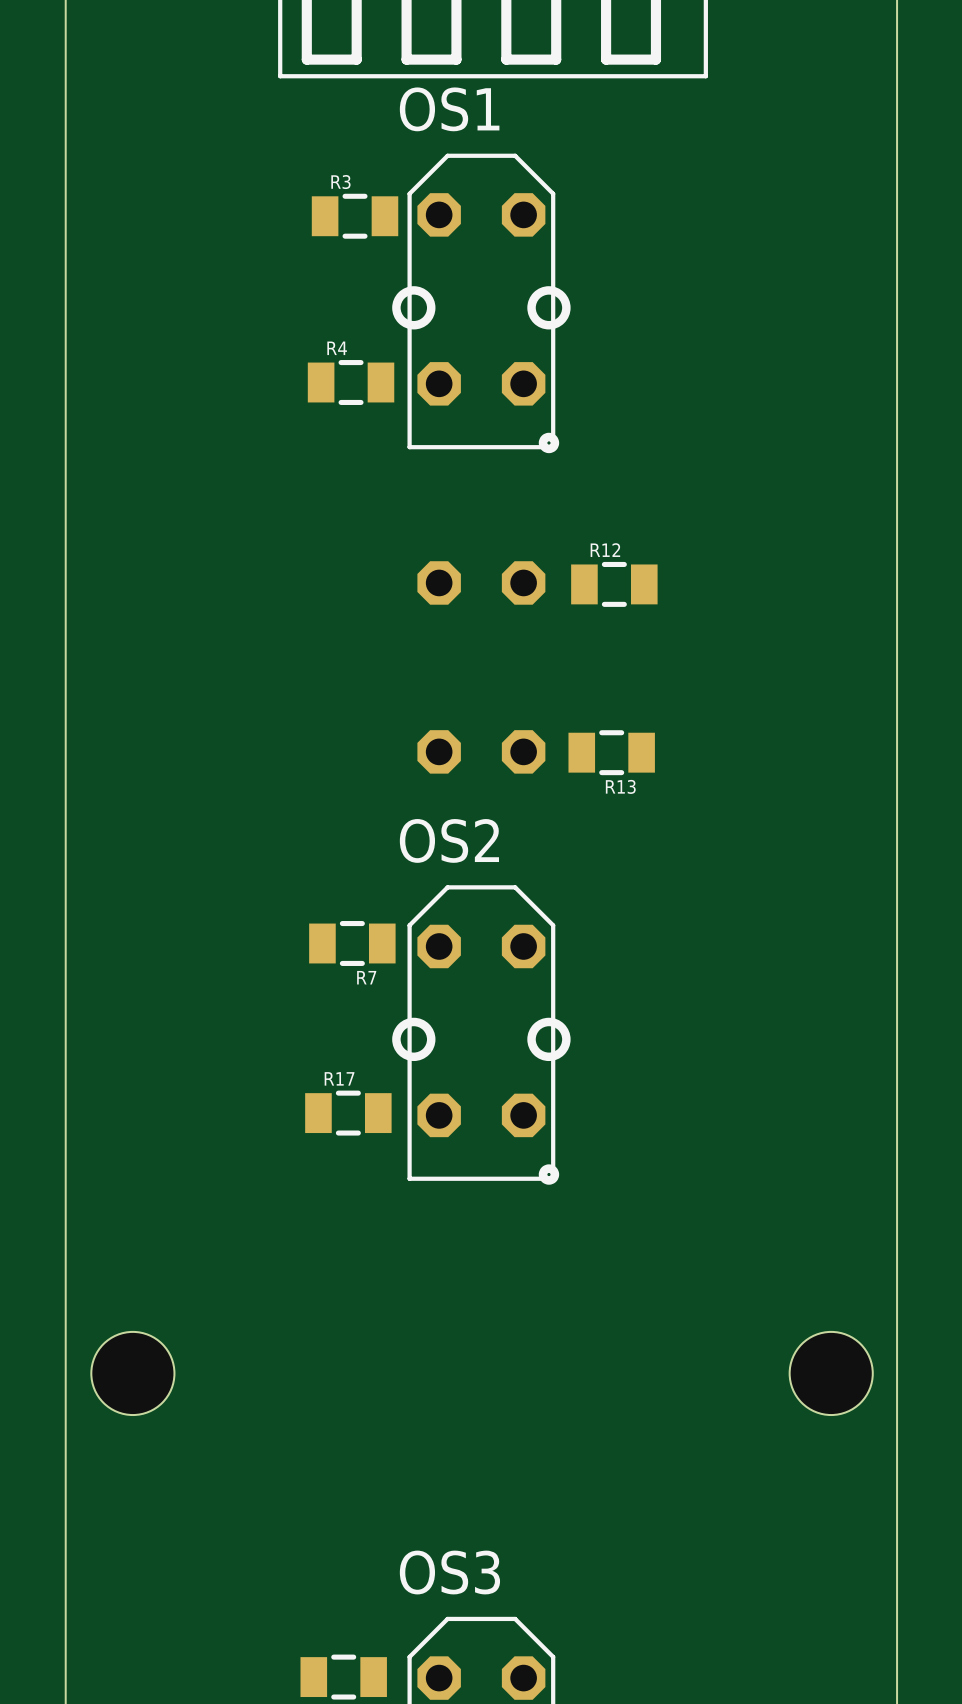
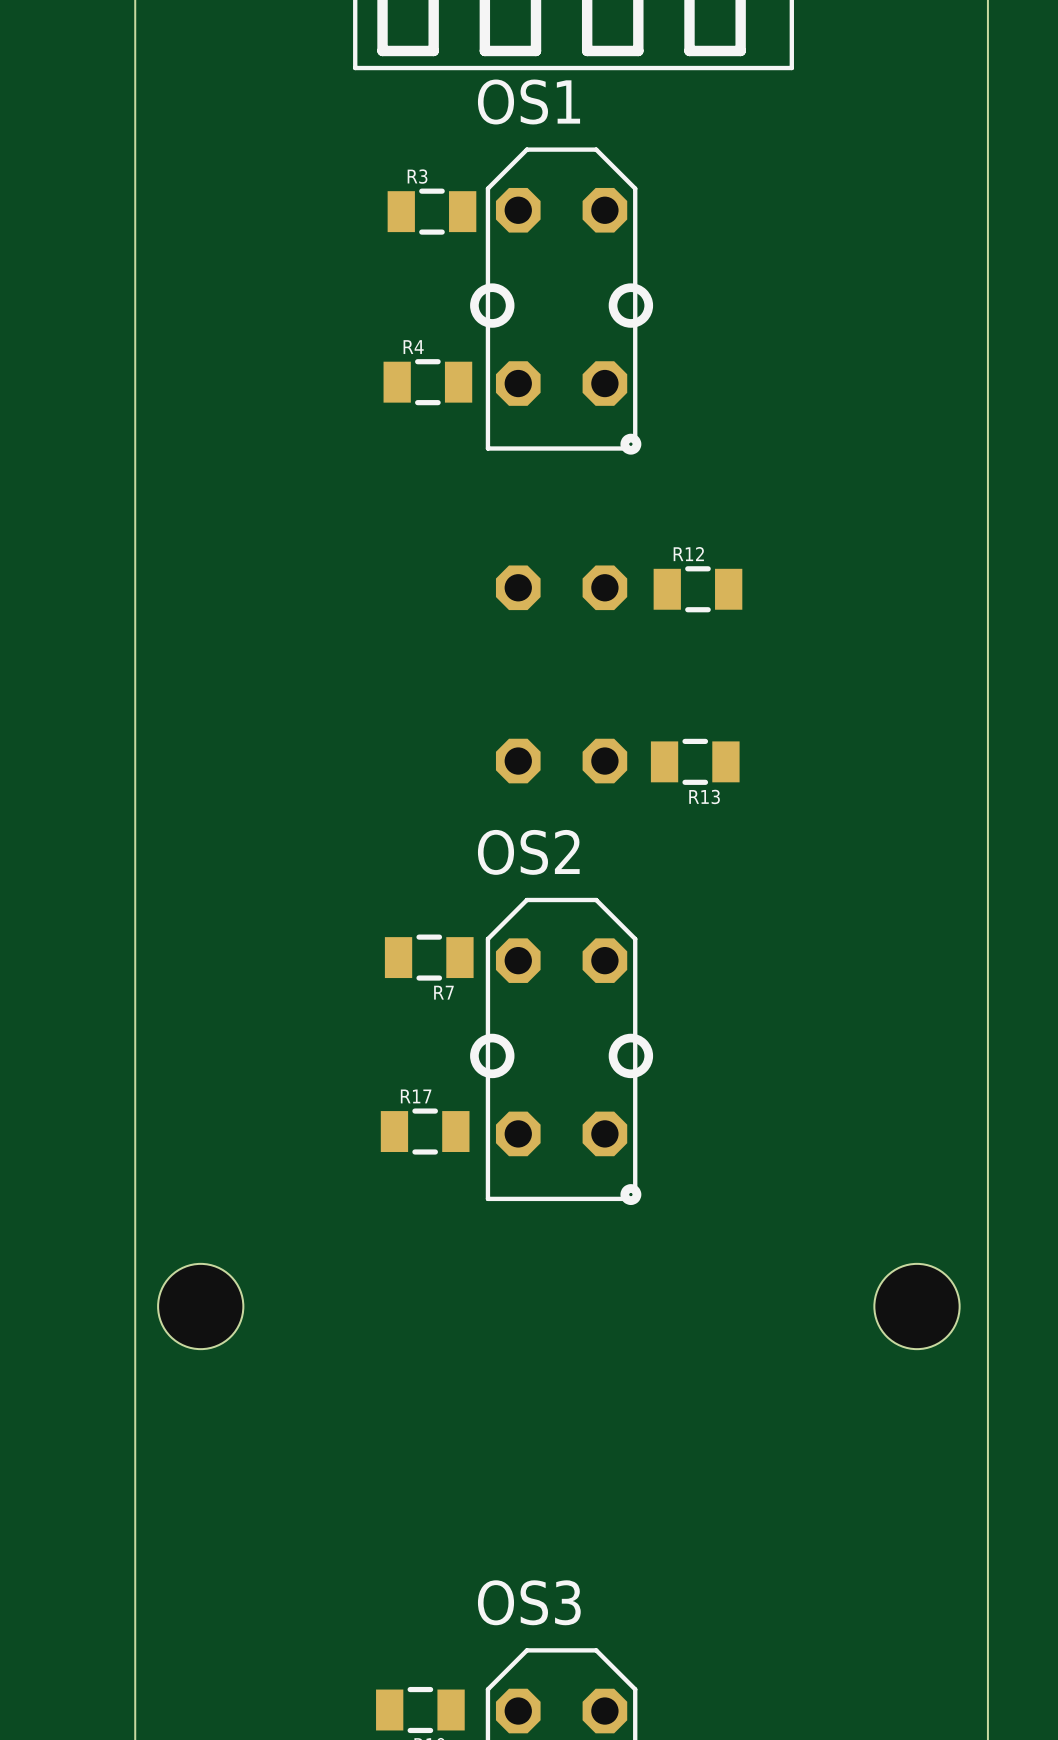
hole position: (132, 1373) -> (200, 1306)
hole position: (831, 1373) -> (916, 1306)

